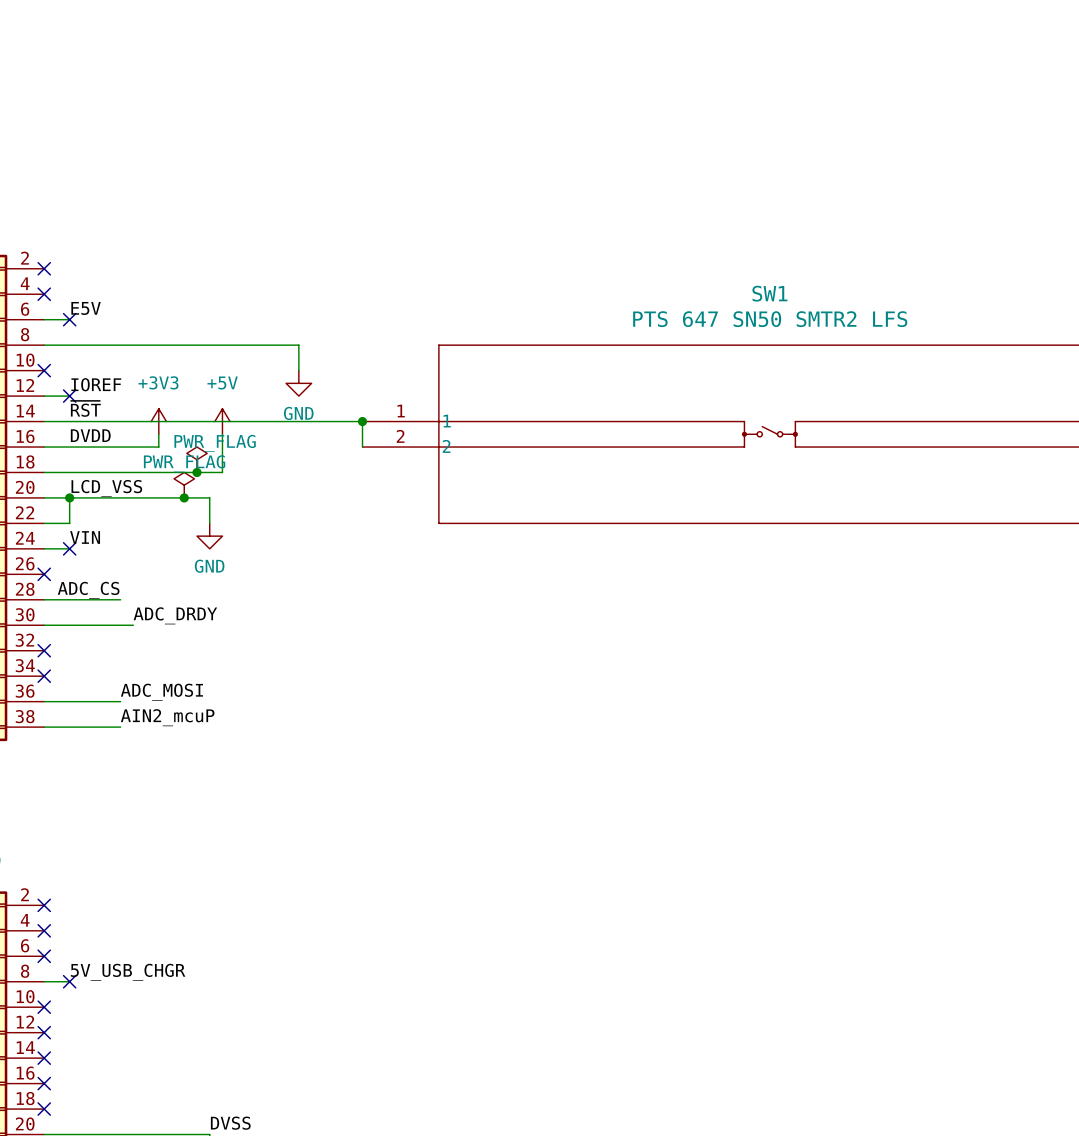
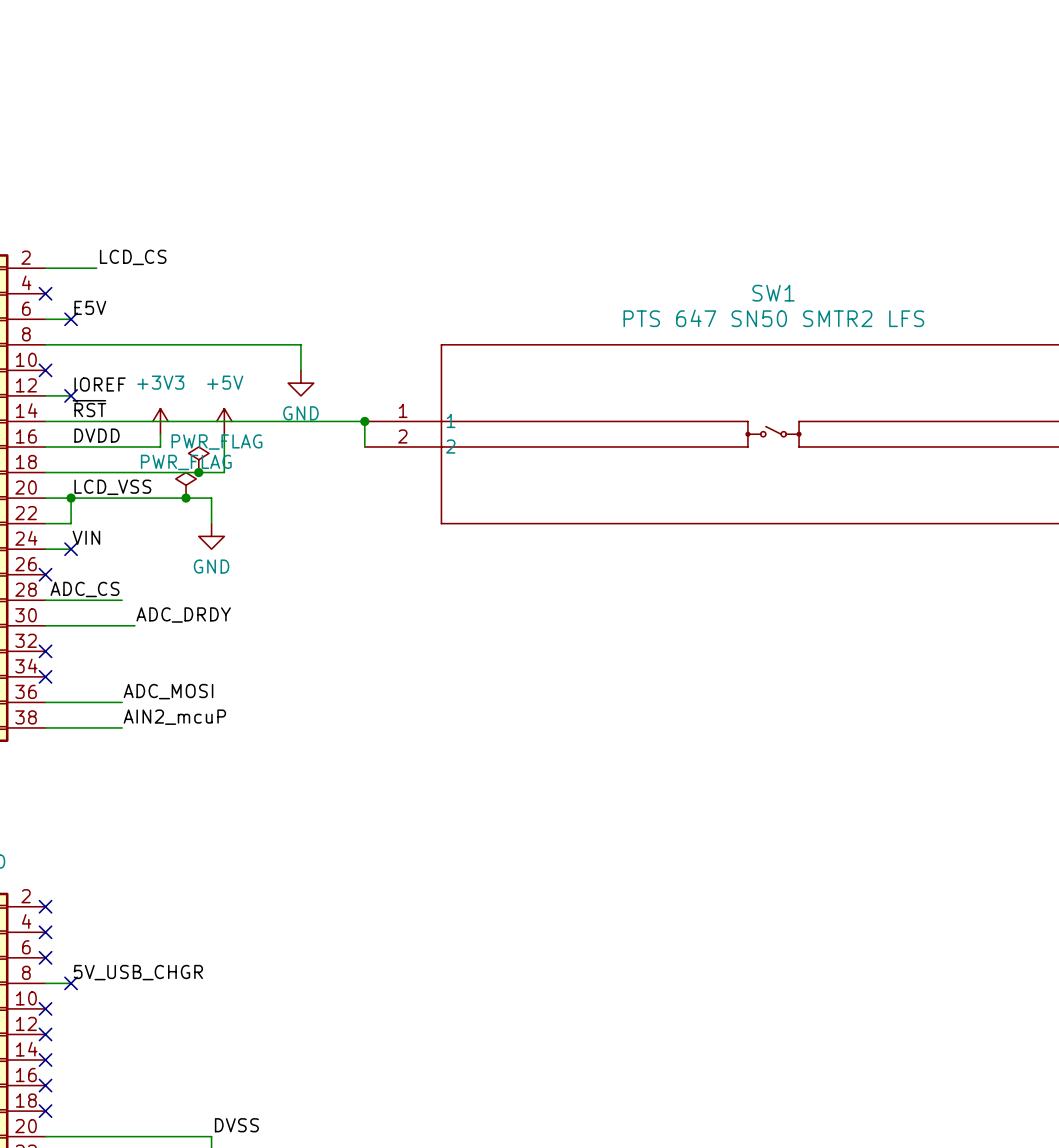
label: none -> LCD_CS (133, 257)
wire: none -> (45, 268) (96, 268)
no-connect mark: (44, 268) -> none

